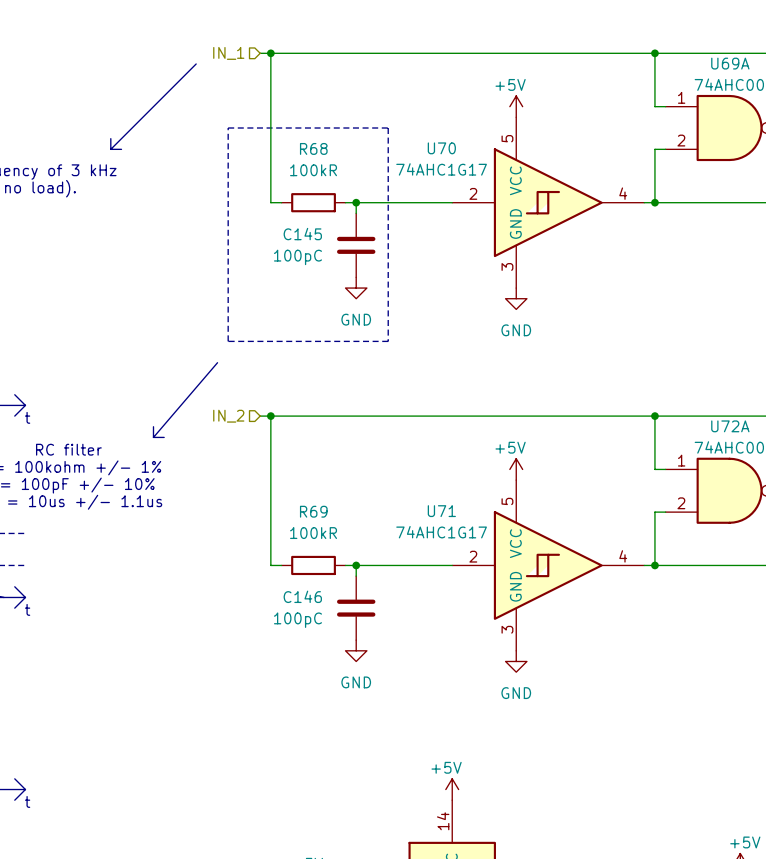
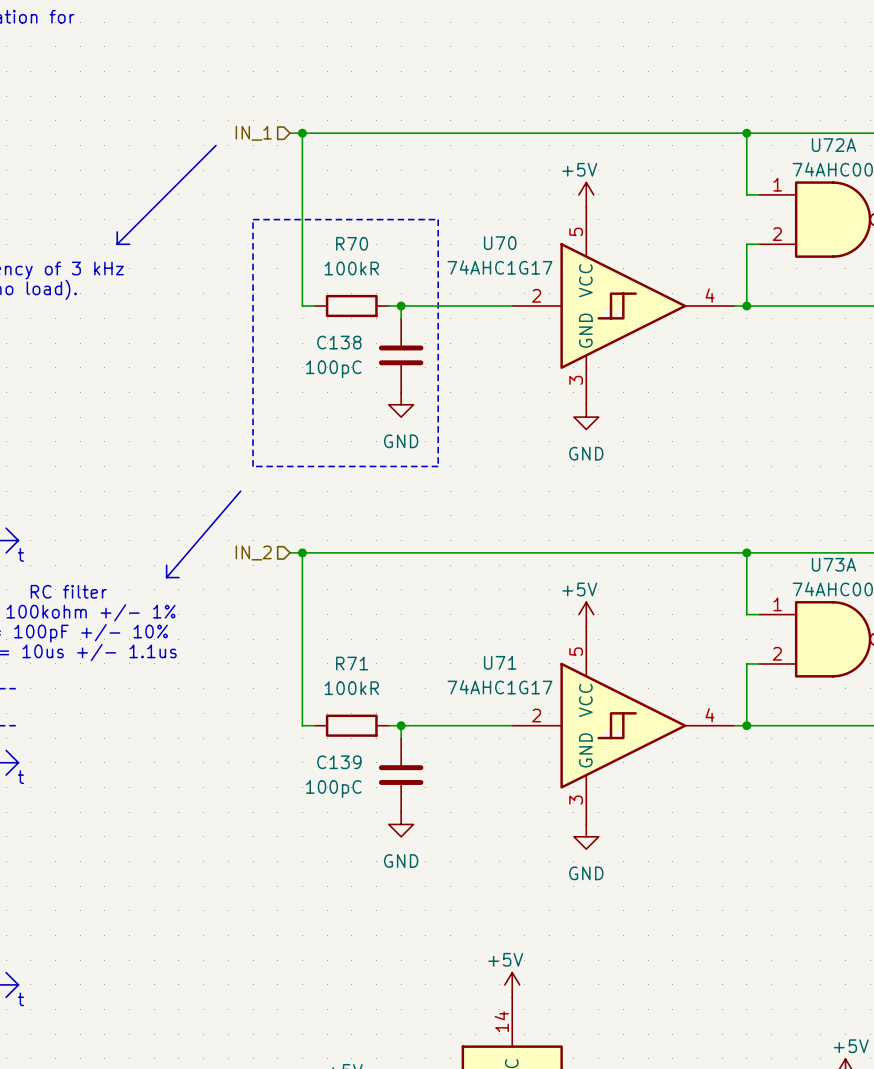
U69A name: U69A (730, 63) -> U72A (834, 145)
R68 name: R68 (313, 148) -> R70 (352, 243)
C145 name: C145 (302, 234) -> C138 (339, 342)
U72A name: U72A (730, 426) -> U73A (834, 564)
R69 name: R69 (313, 511) -> R71 (352, 663)
C146 name: C146 (302, 596) -> C139 (339, 762)

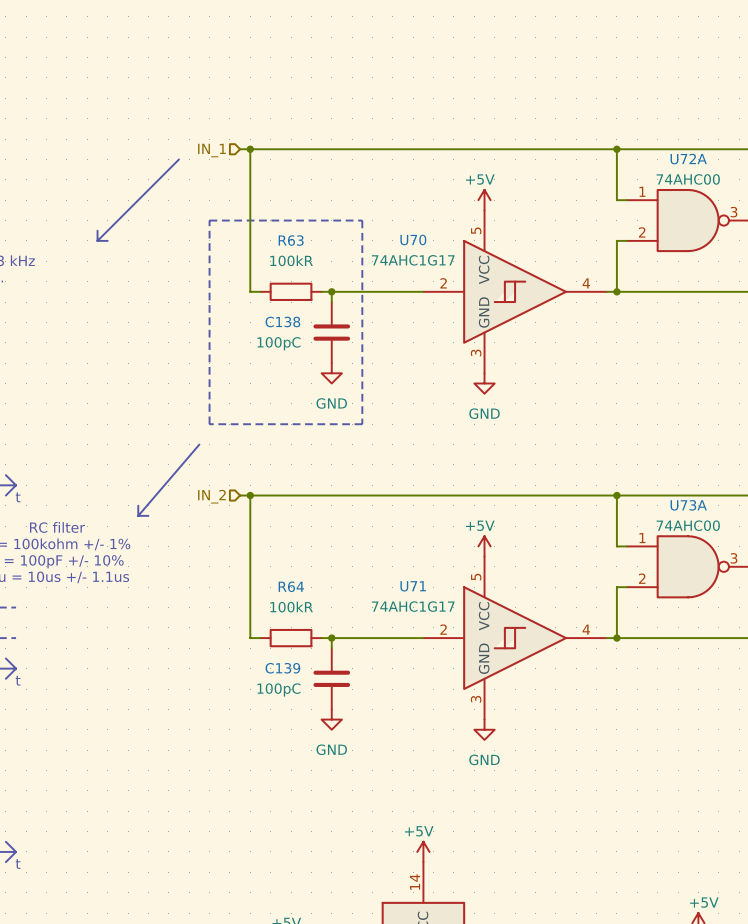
R70 name: R70 (352, 243) -> R63 (291, 240)
R71 name: R71 (352, 663) -> R64 (291, 586)

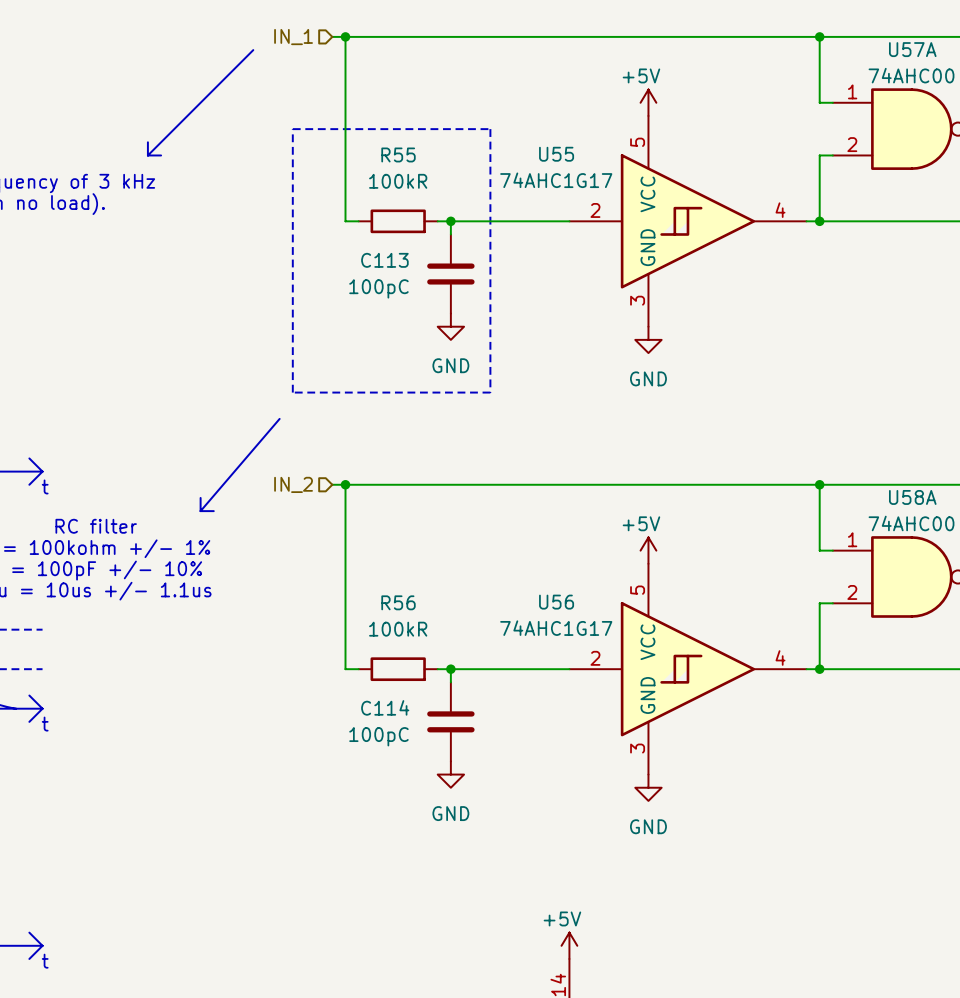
U72A name: U72A (688, 159) -> U57A (912, 49)
U70 name: U70 (413, 239) -> U55 (556, 154)
R63 name: R63 (291, 240) -> R55 (398, 154)
C138 name: C138 (282, 322) -> C113 (384, 260)
U73A name: U73A (688, 505) -> U58A (912, 497)
R64 name: R64 (291, 586) -> R56 (398, 602)
U71 name: U71 (413, 586) -> U56 (556, 602)
C139 name: C139 (282, 668) -> C114 (385, 707)

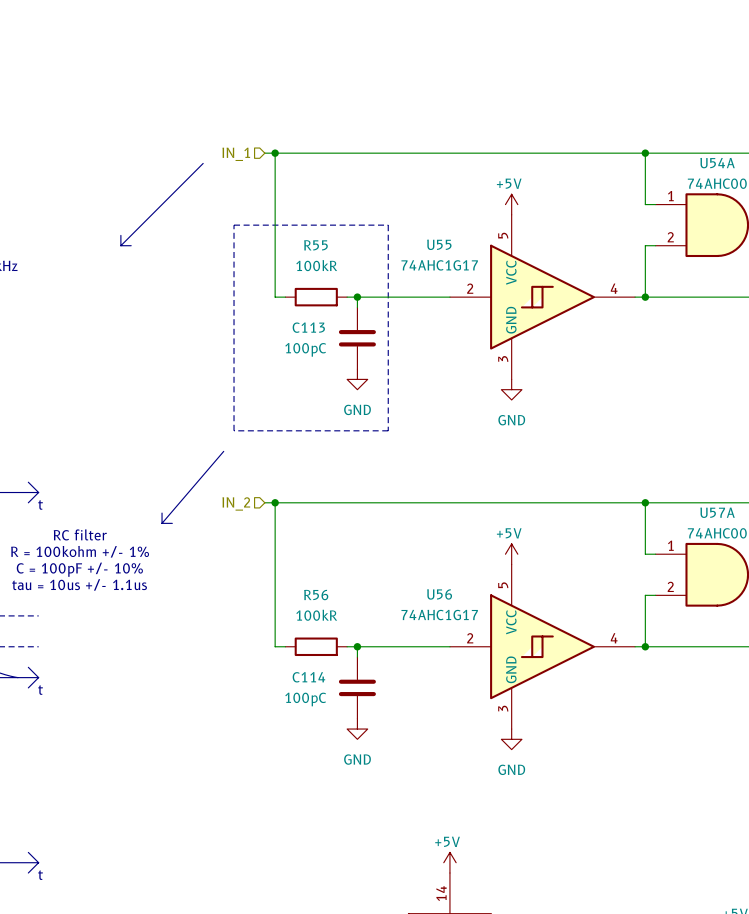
U57A name: U57A (912, 49) -> U54A (717, 163)
U58A name: U58A (912, 497) -> U57A (717, 512)

